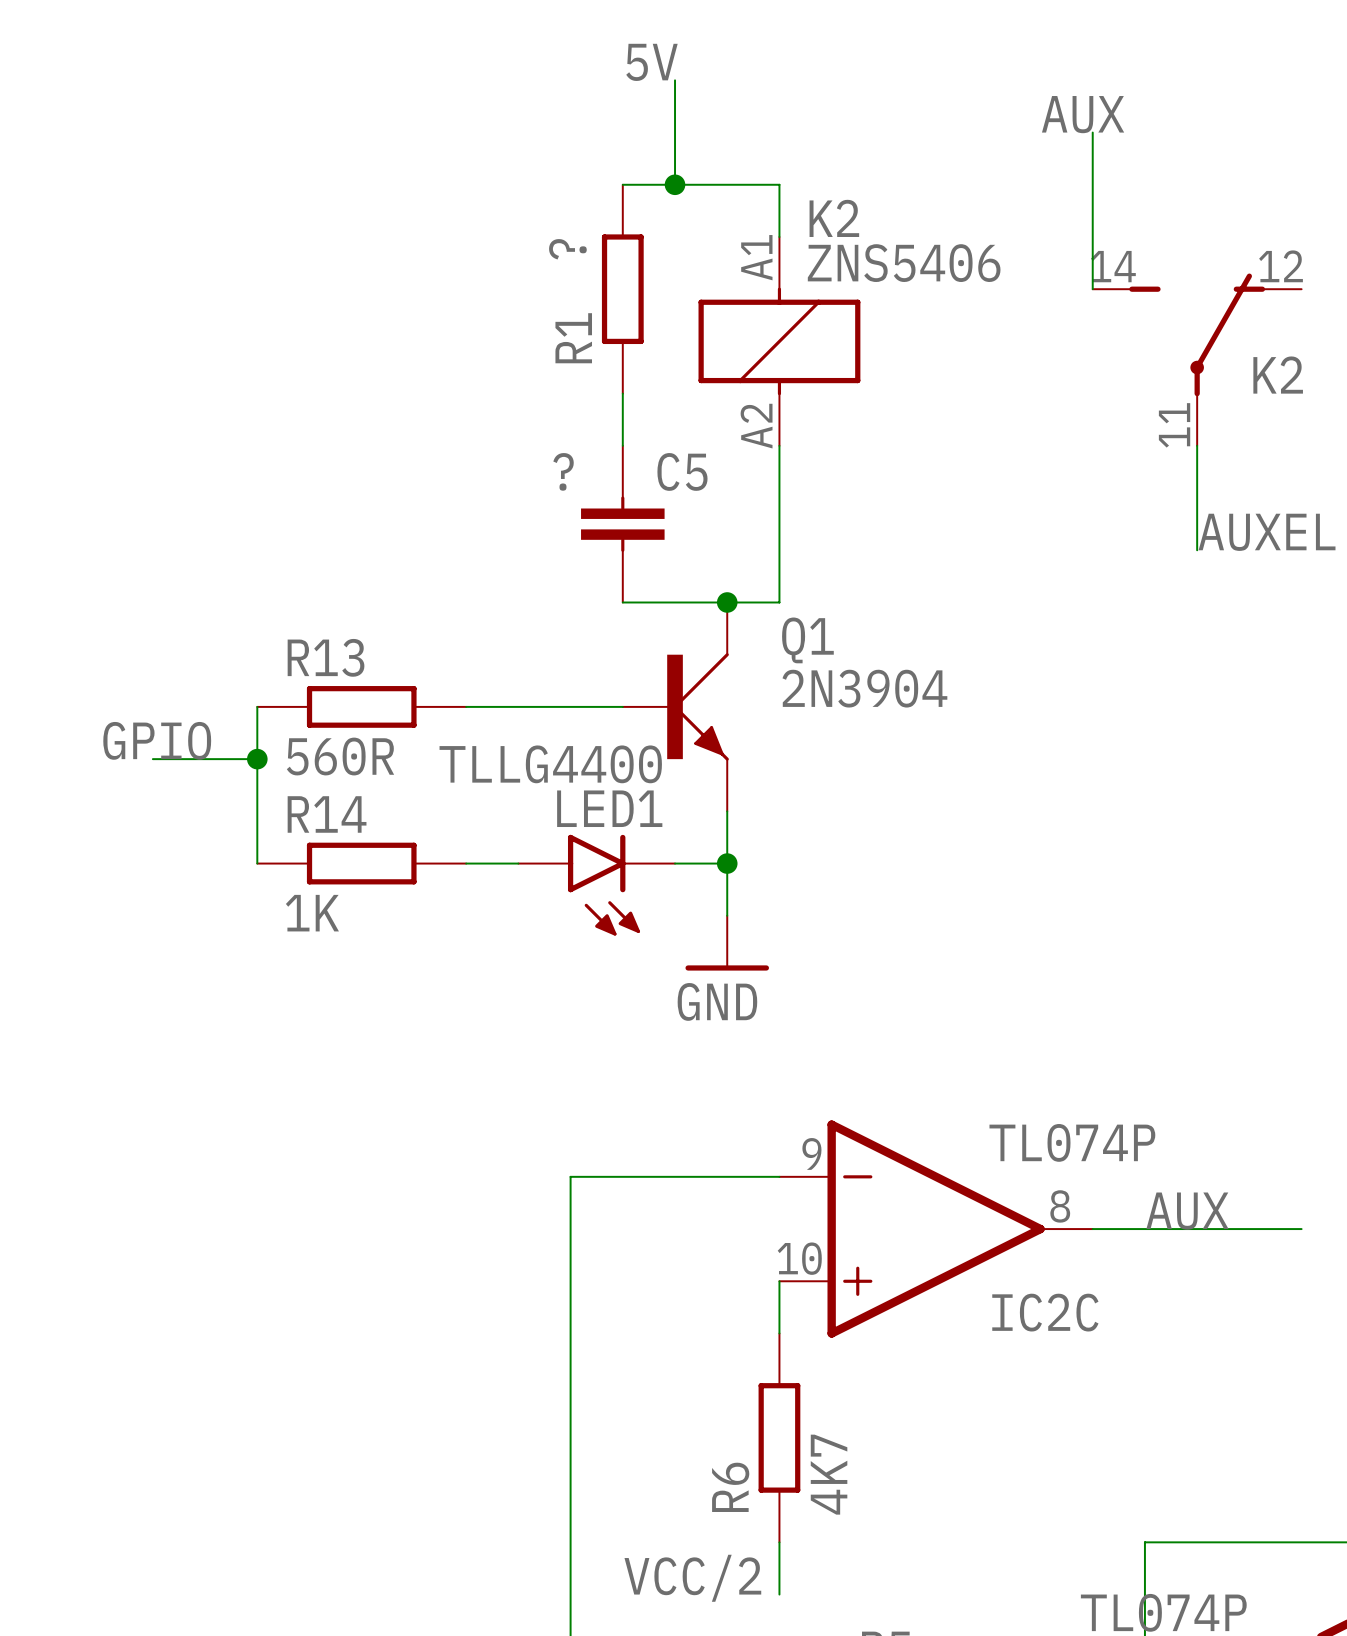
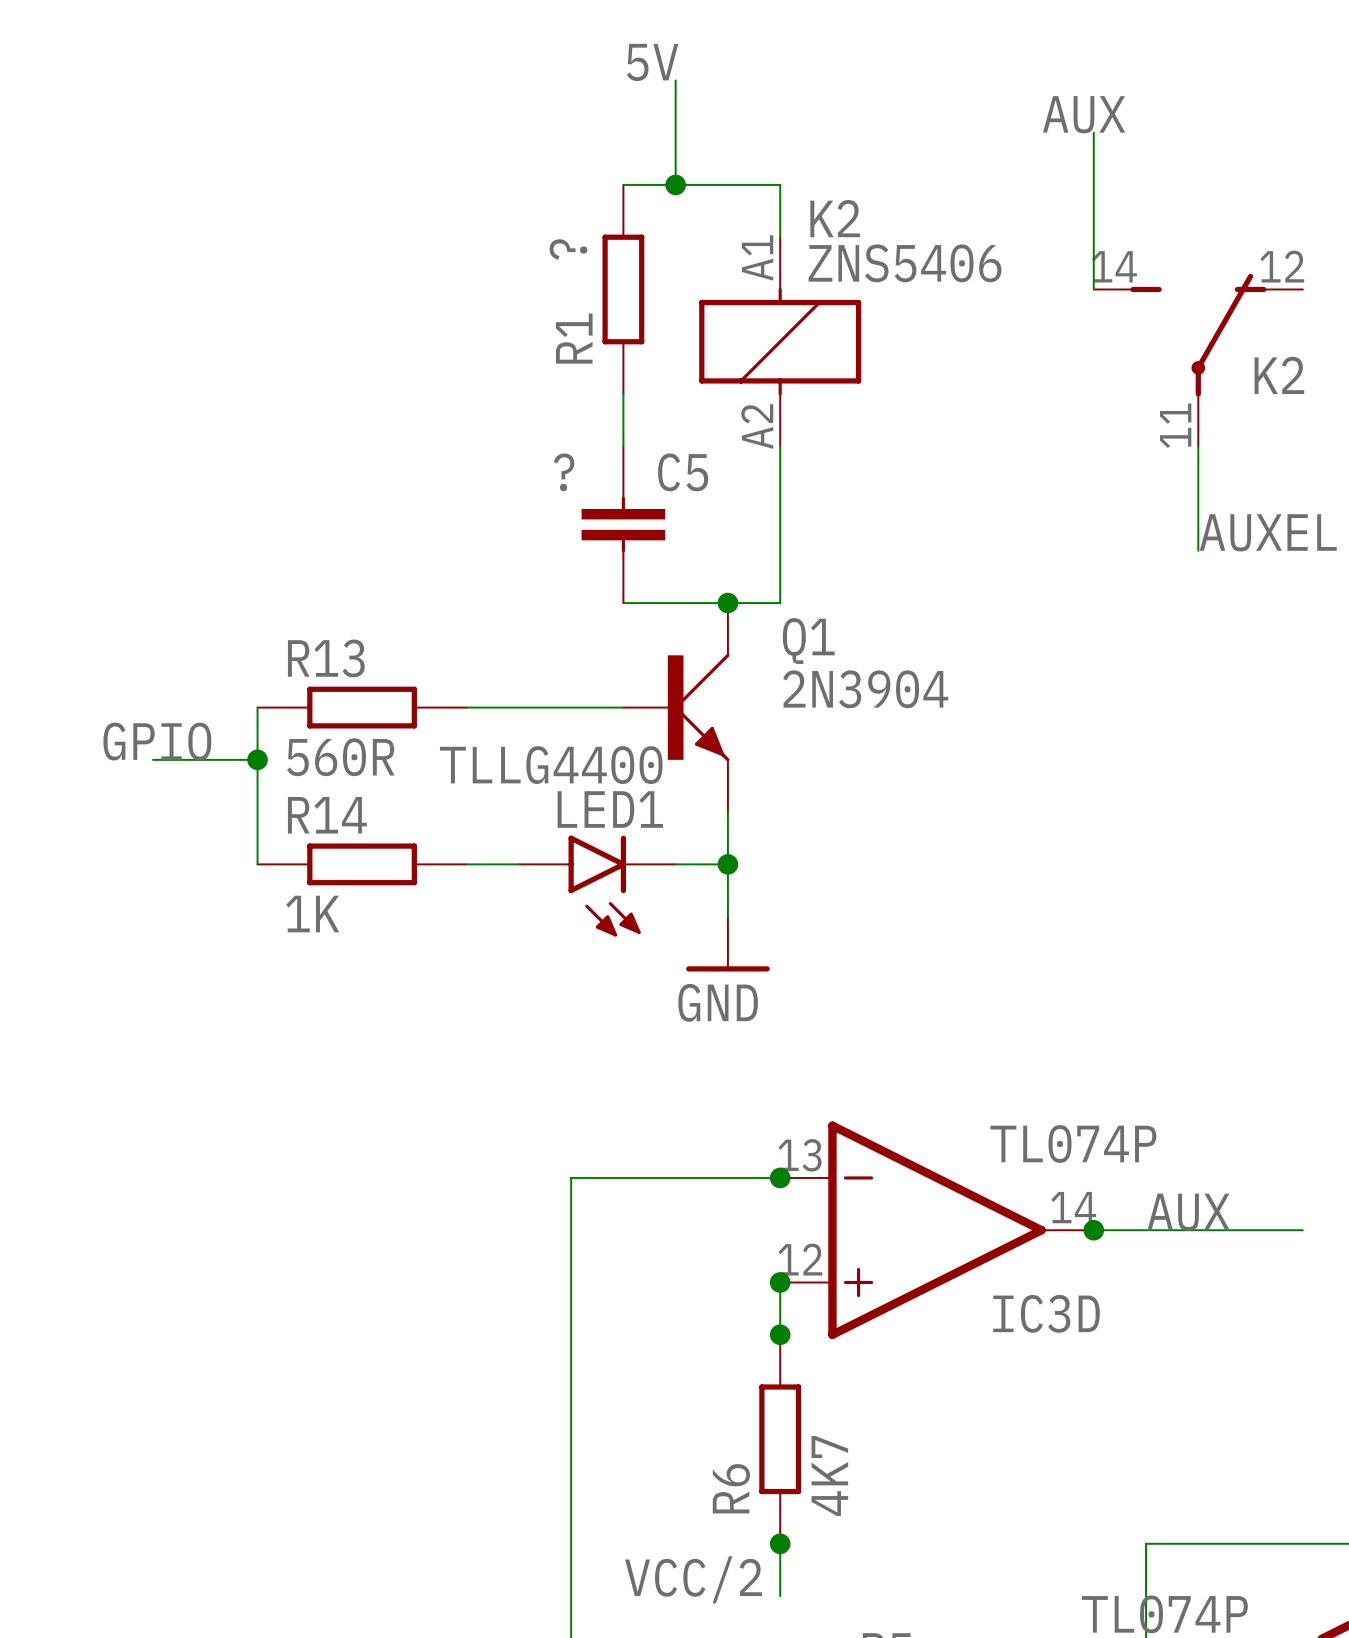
IC2C pin number: 9 (811, 1153) -> 13 (799, 1155)
junction: none -> (780, 1177)
IC2C pin number: 8 (1060, 1206) -> 14 (1073, 1207)
junction: none -> (1093, 1230)
IC2C pin number: 10 (799, 1258) -> 12 (800, 1259)
junction: none -> (780, 1282)
IC2C name: IC2C (1045, 1312) -> IC3D (1046, 1313)
junction: none -> (780, 1334)
junction: none -> (780, 1543)

